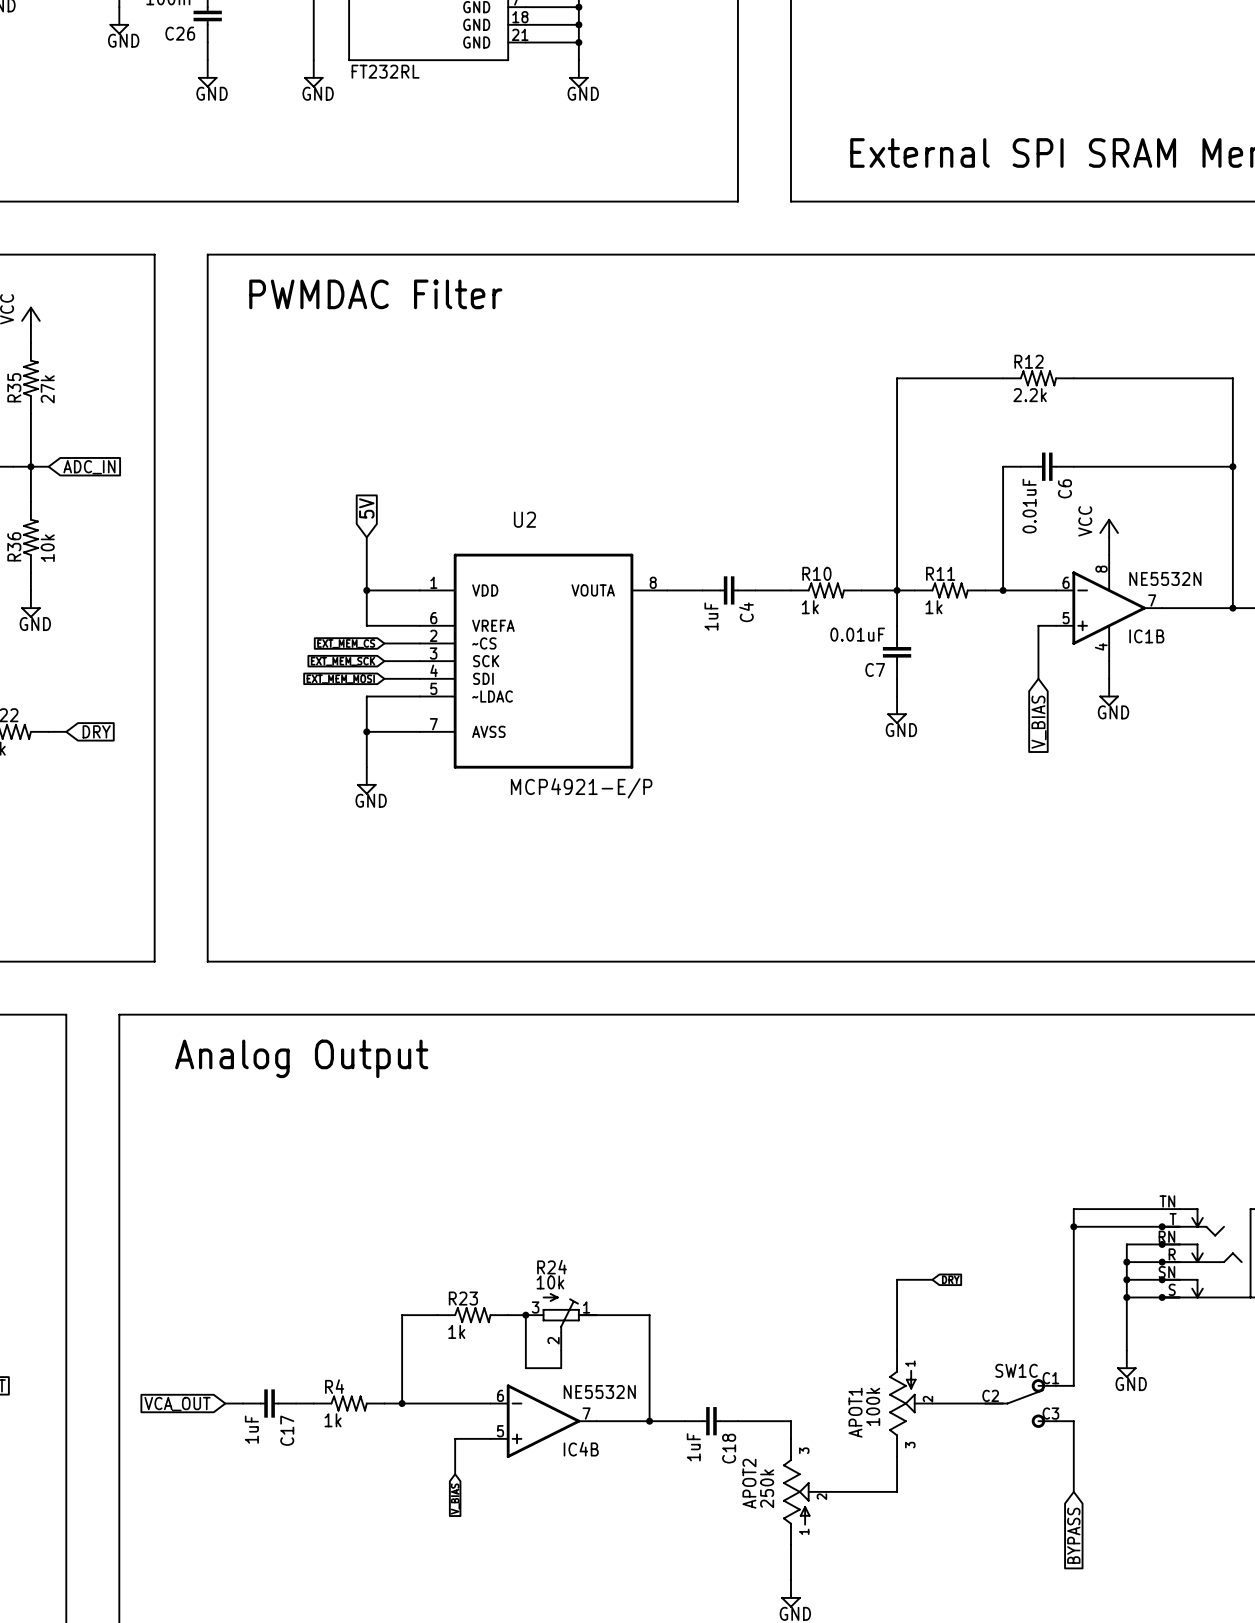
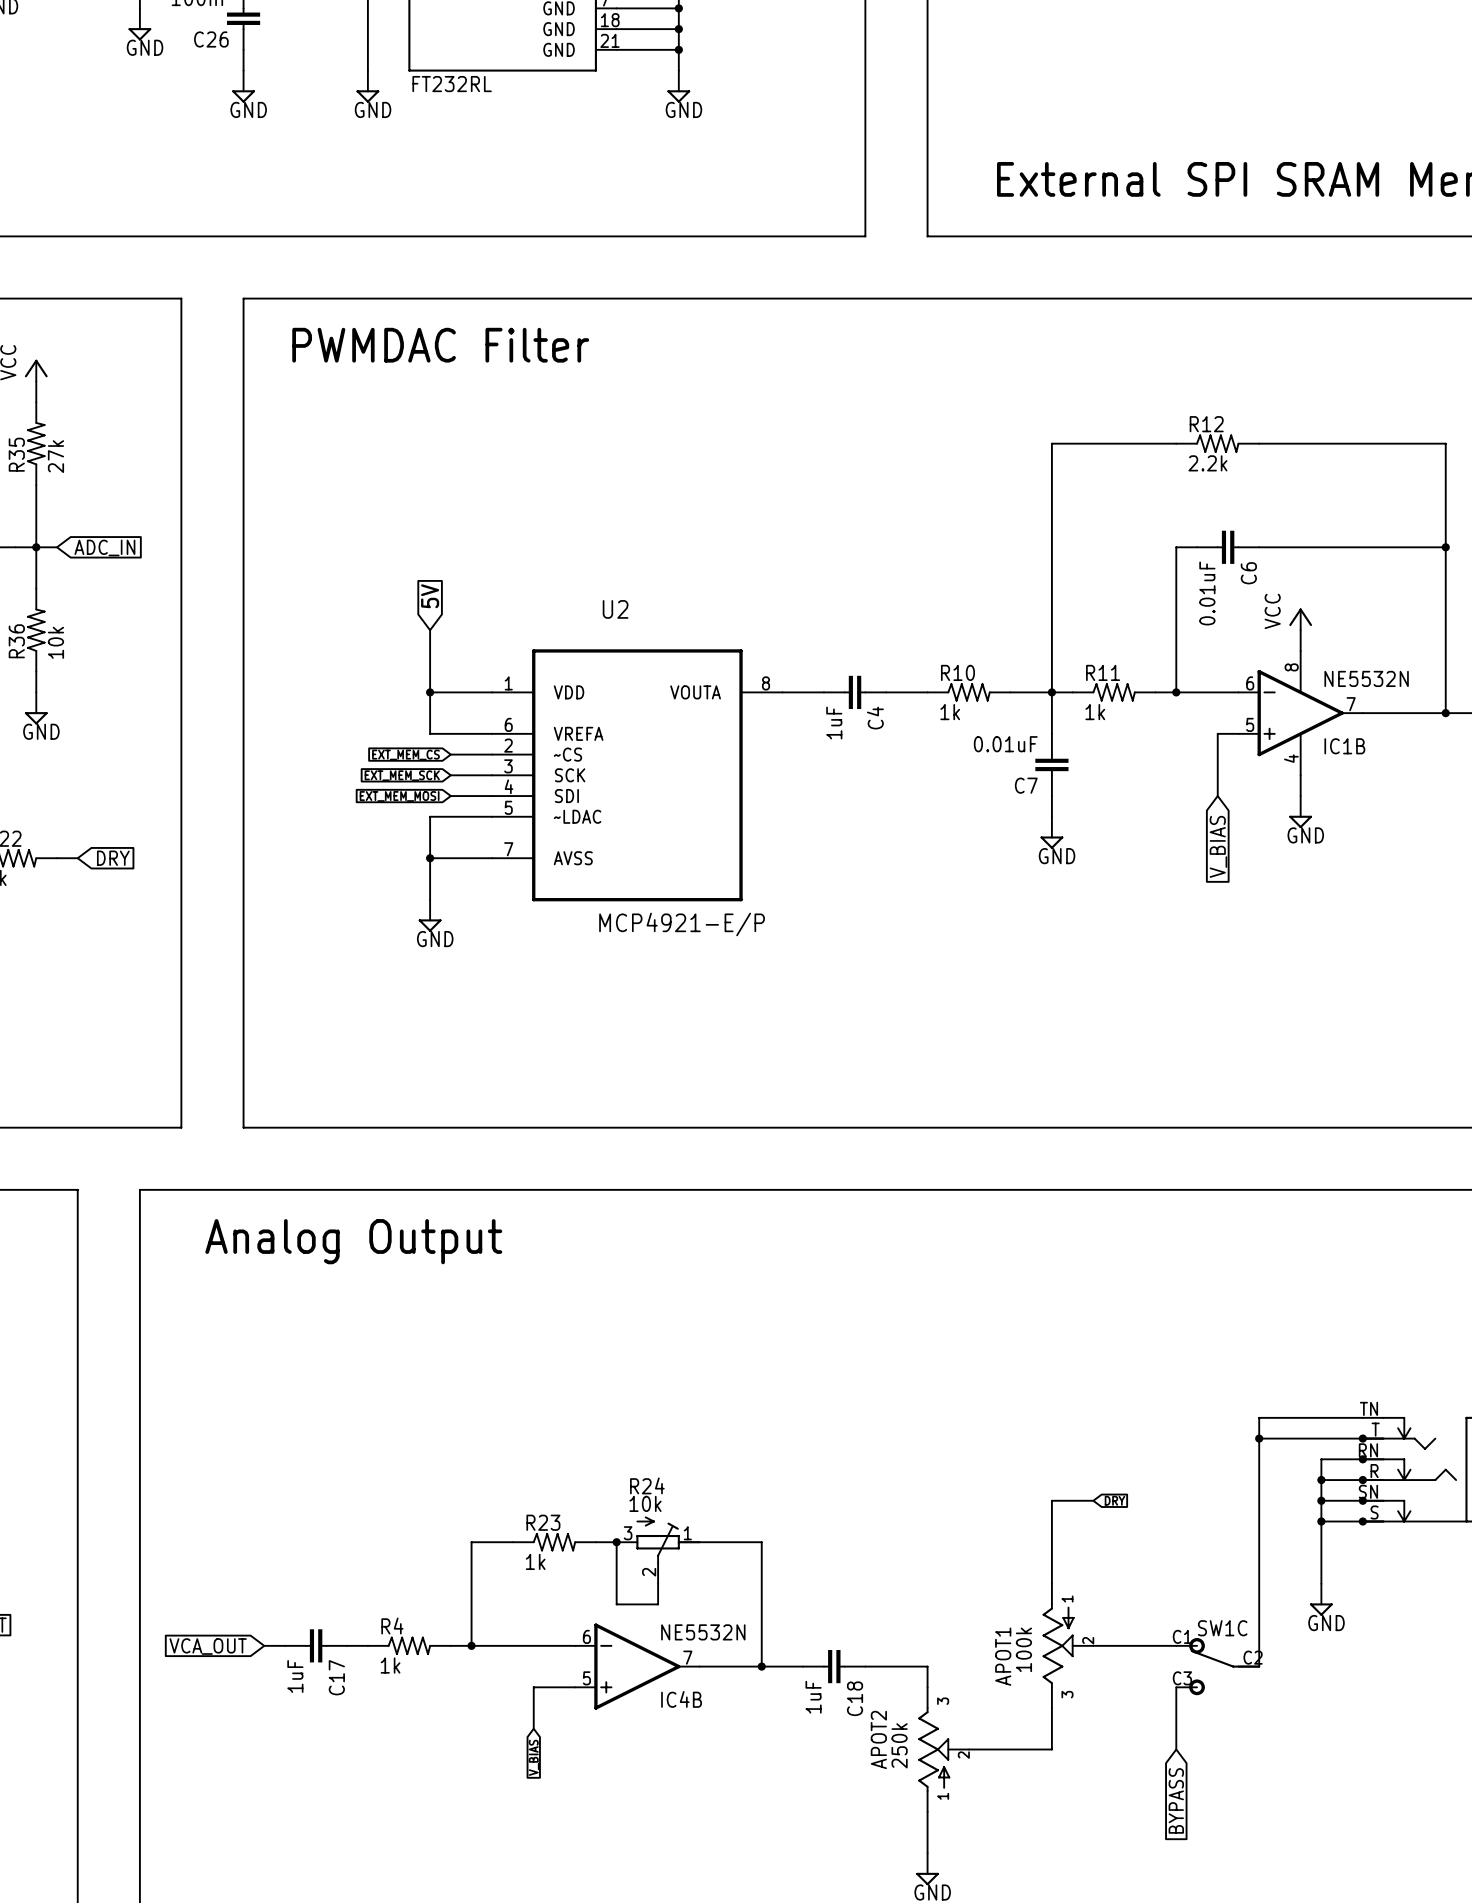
wire: (1056, 1385) (1073, 1385) -> (1259, 1666) (1259, 1625)
SW1C flip: as is (1014, 1403) -> left-right (1224, 1666)
wire: (1056, 1421) (1073, 1421) (1073, 1491) -> none
wire: none -> (1176, 1687) (1176, 1749)
global label position: BYPASS (1073, 1535) -> BYPASS (1176, 1800)

